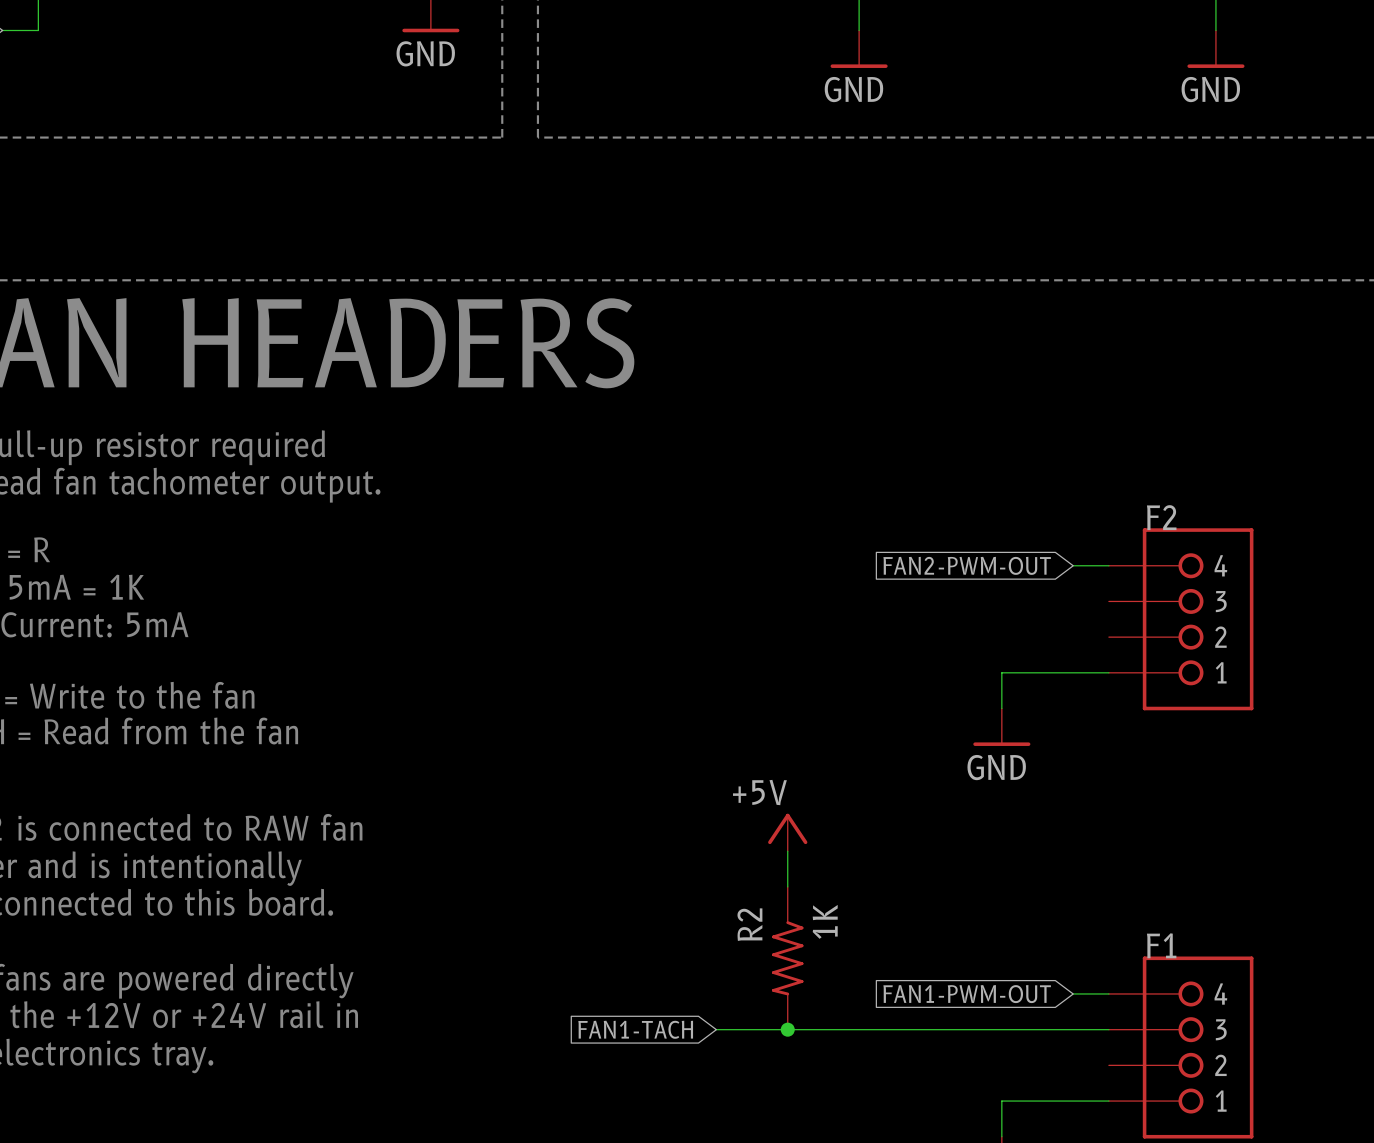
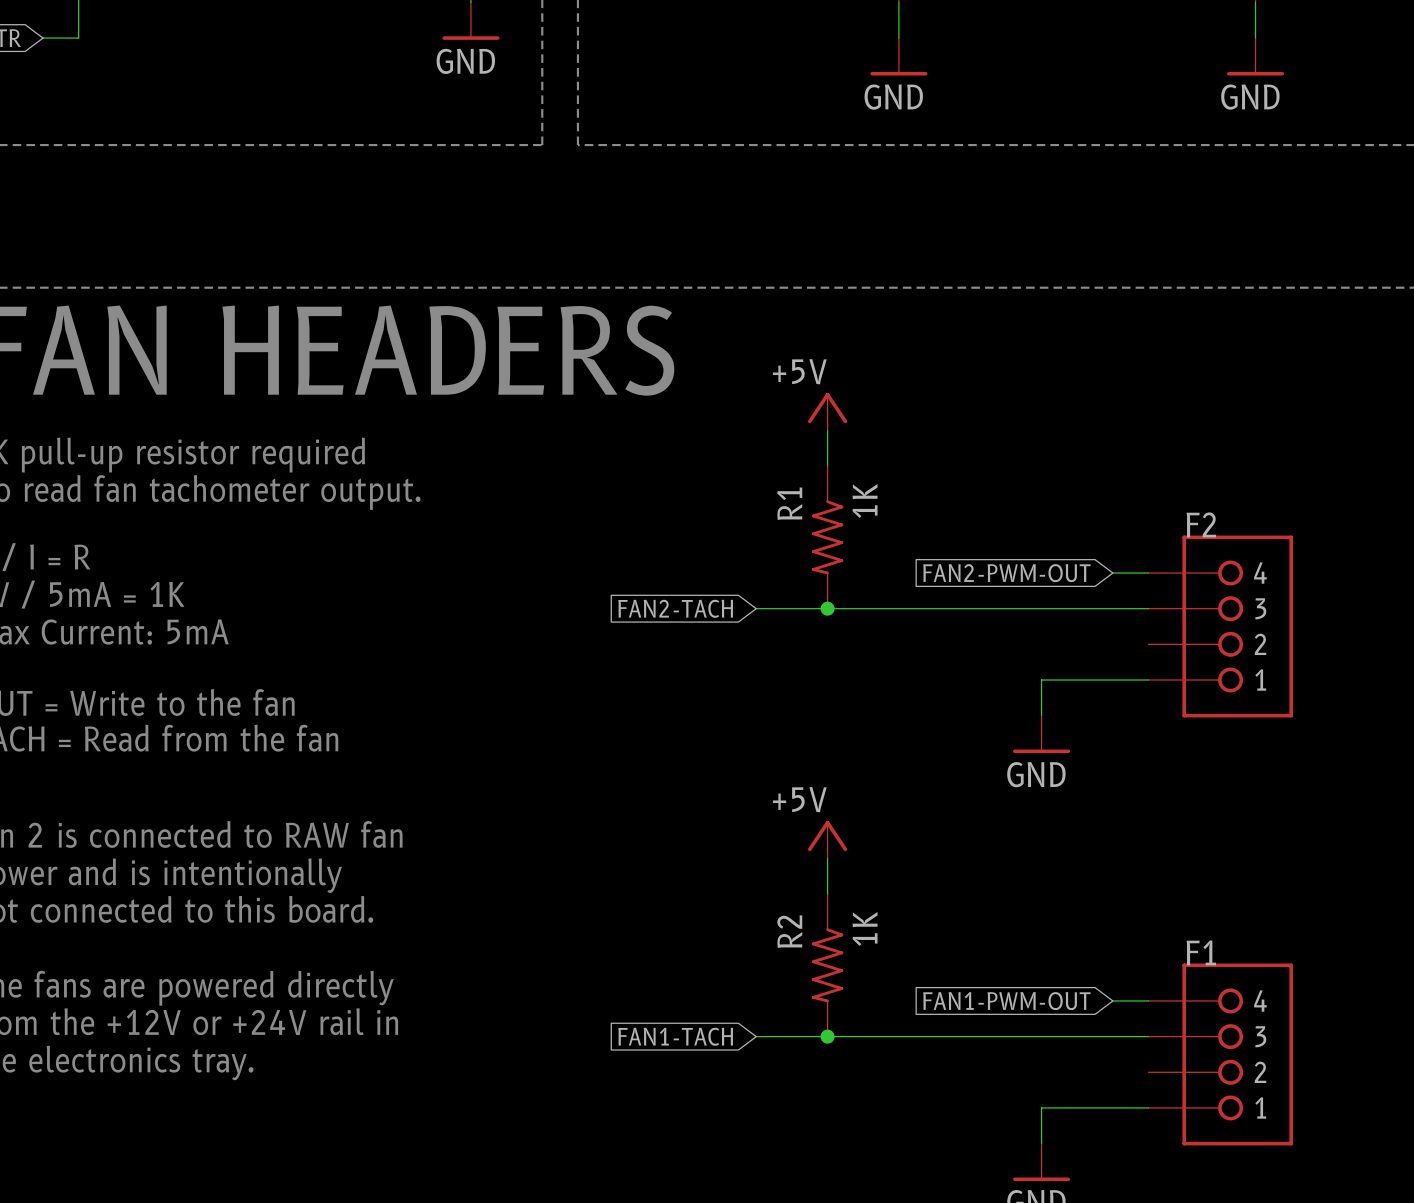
power symbol: none -> +5V (827, 411)
wire: none -> (827, 430) (827, 466)
R1: none -> 1K (827, 537)
global label: none -> FAN2-TACH (675, 608)
wire: none -> (756, 608) (1148, 608)
junction: none -> (827, 608)

